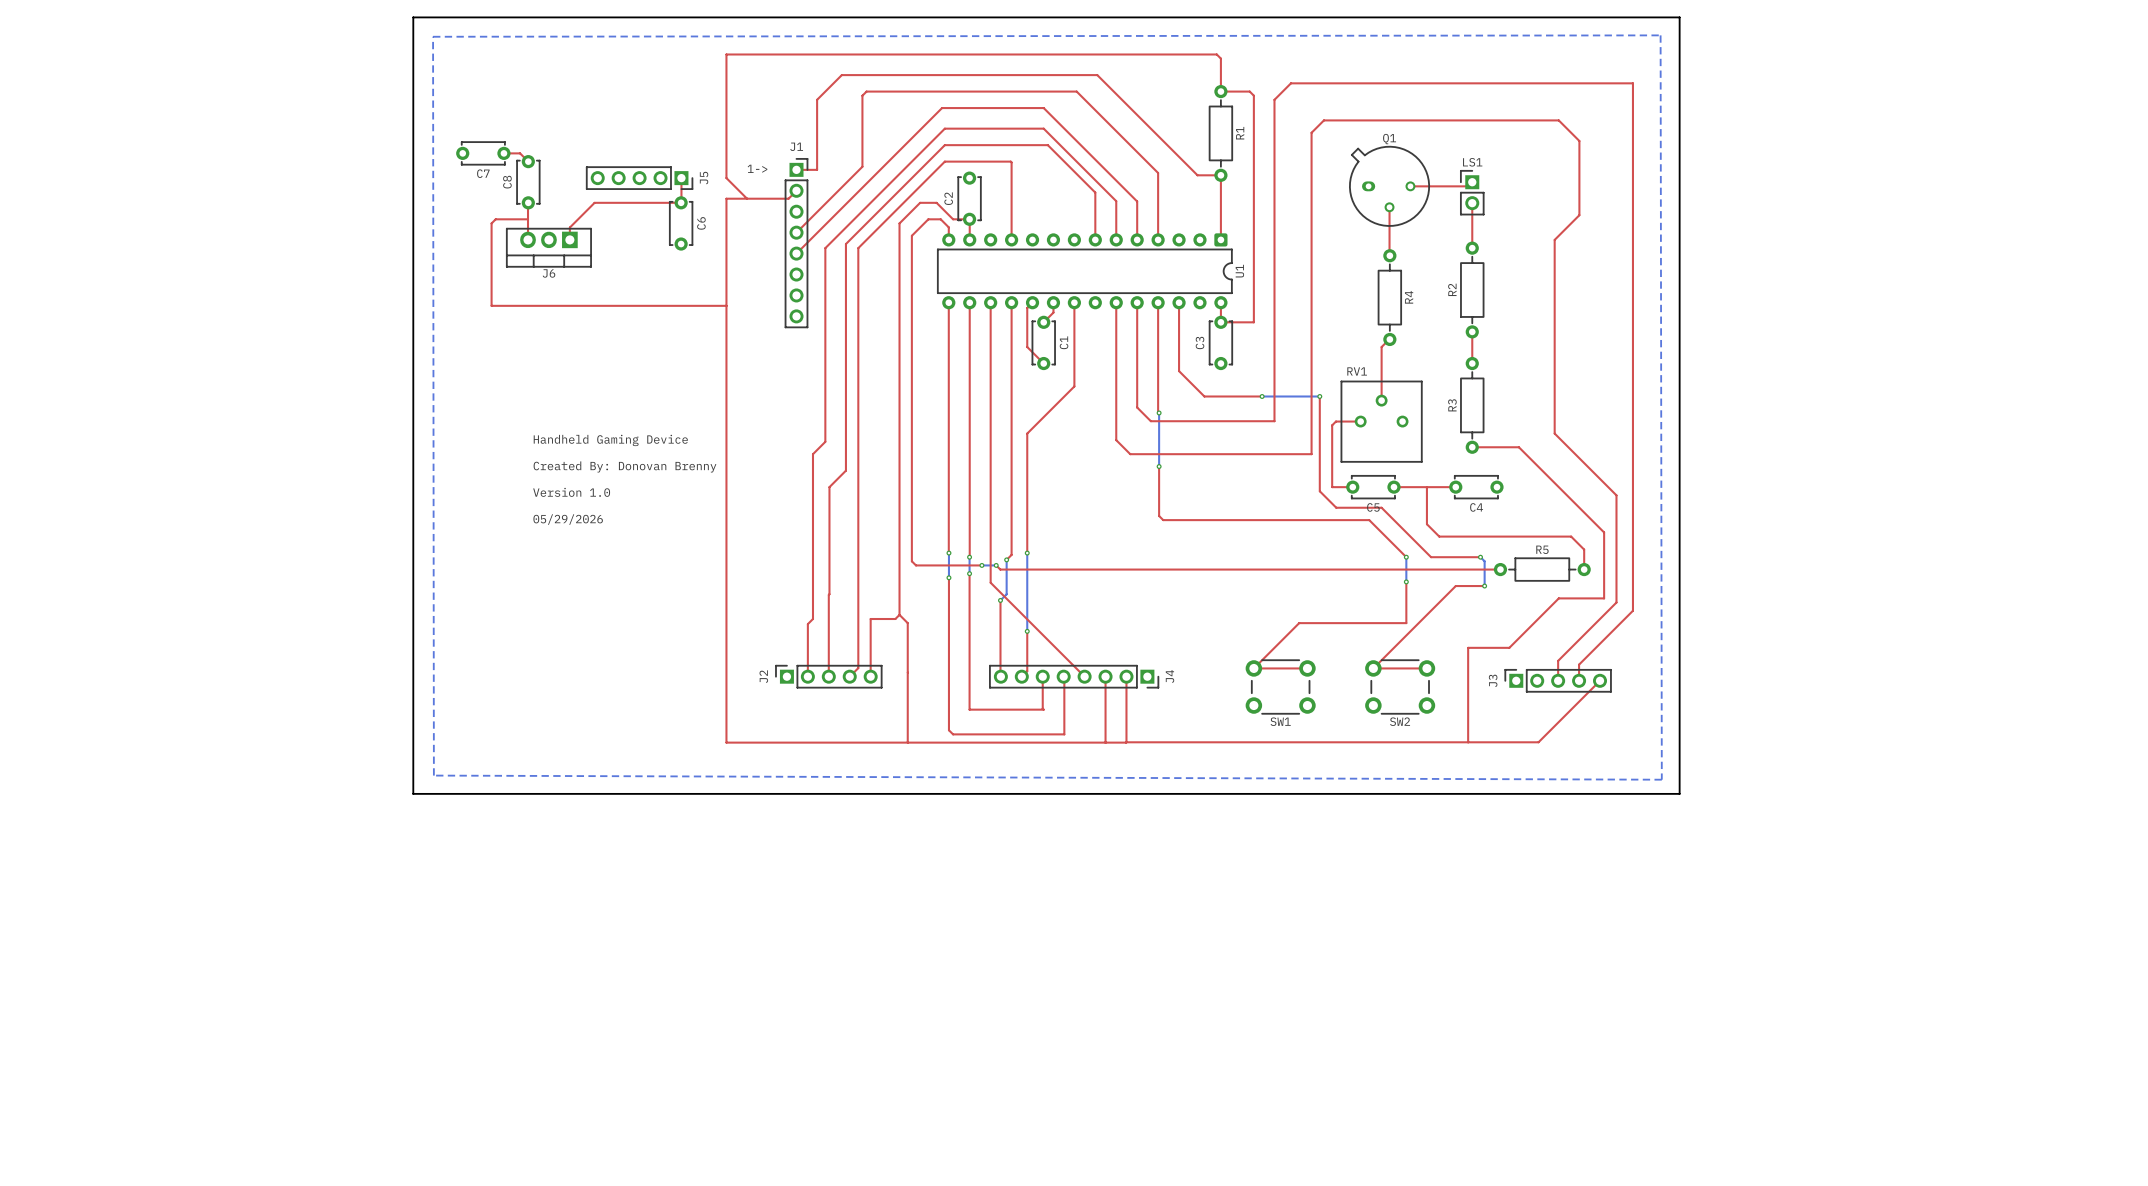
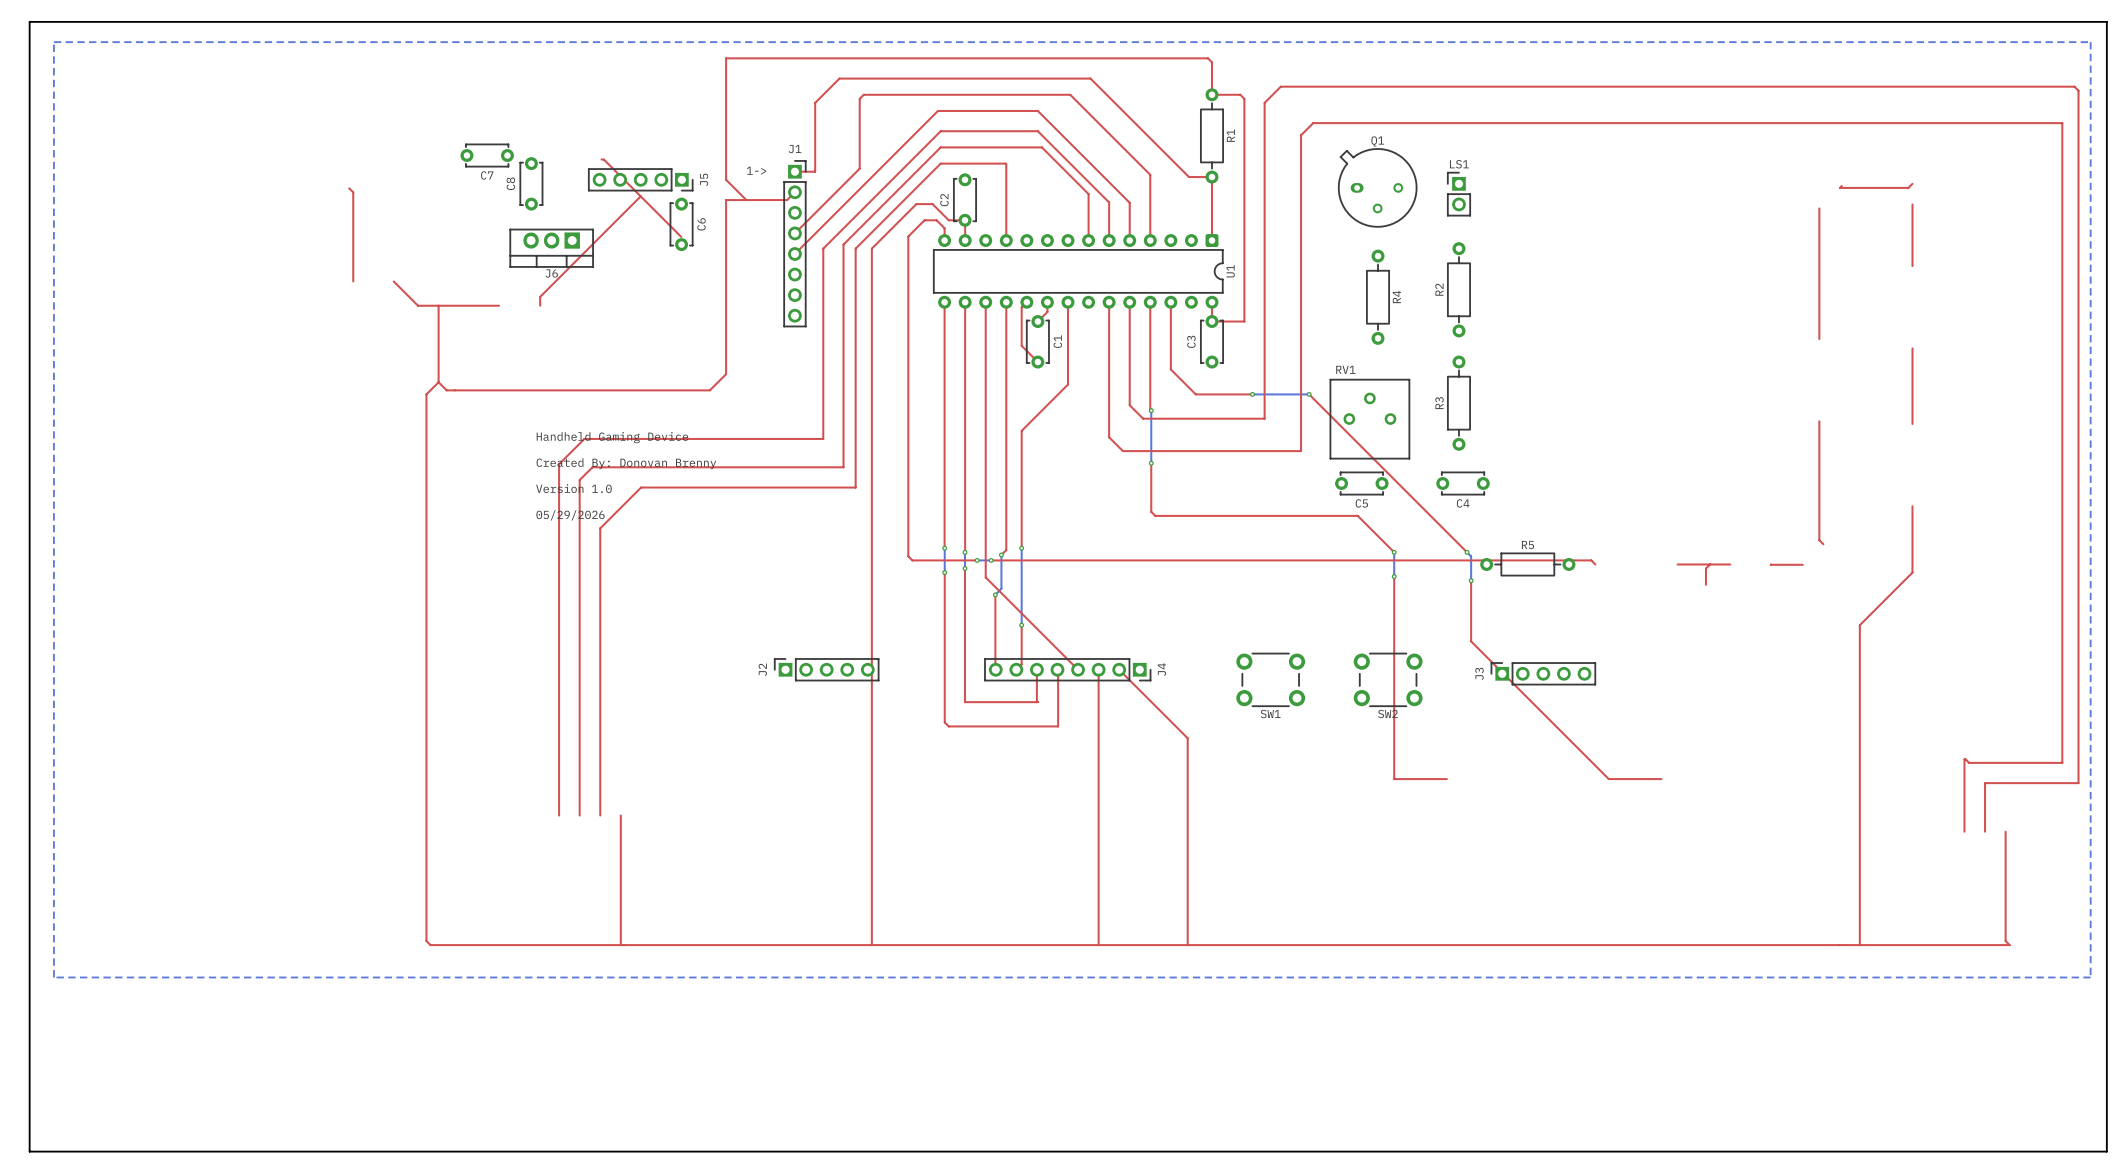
board edge: (413, 17) (413, 793) (1679, 793) (1679, 17) -> (418, 21) (29, 21) (29, 1151) (2106, 1151) (2106, 21) (1662, 21)
bottom zone outline: (1660, 35) (433, 36) (433, 775) (1661, 779) (1660, 35) -> none
bottom zone outline: none -> (53, 42) (2090, 42) (2090, 977) (53, 977) (53, 42)
top track: (1632, 83) (1632, 610) (1579, 664) (1579, 680) -> (1616, 86) (2074, 86) (2078, 90) (2078, 783) (1985, 783) (1985, 831)
top track: (1558, 120) (1579, 141) (1579, 215) (1554, 239) (1554, 433) (1616, 495) (1616, 602) (1558, 660) (1558, 680) -> (1544, 123) (2062, 123) (2062, 762) (1969, 762) (1965, 758) (1964, 831)
top track: (503, 153) (520, 153) (528, 161) -> none
top track: none -> (601, 159) (603, 159) (681, 236)
top track: (681, 178) (681, 202) (594, 202) (569, 227) (569, 239) -> none
top track: (1472, 182) (1468, 186) (1410, 186) -> none
top track: none -> (1912, 183) (1908, 187) (1839, 187) (1841, 186)
top track: none -> (349, 188) (353, 192) (353, 281)
top track: none -> (640, 196) (540, 296) (540, 305)
top track: (528, 202) (528, 239) -> none
top track: (1472, 203) (1472, 248) -> none
top track: none -> (1912, 204) (1912, 266)
top track: (1389, 207) (1389, 255) -> none
top track: none -> (1819, 208) (1819, 339)
top track: (528, 219) (495, 219) (491, 223) (491, 305) (726, 305) -> none
top track: (899, 223) (899, 614) -> (896, 224) (871, 248) (871, 945)
top track: none -> (393, 281) (418, 305) (499, 305)
top track: none -> (438, 305) (438, 382)
top track: (1472, 331) (1472, 363) -> none
top track: (1389, 339) (1381, 347) (1381, 400) -> none
top track: none -> (1912, 348) (1912, 424)
top track: (726, 375) (726, 742) (1126, 742) -> (726, 374) (709, 390) (446, 390) (438, 382)
top track: none -> (438, 382) (426, 394) (426, 941) (430, 945) (2009, 945) (2005, 941) (2005, 831)
top track: (1319, 396) (1319, 491) (1336, 507) (1381, 507) (1431, 557) (1480, 557) -> (1309, 394) (1467, 552)
top track: (1360, 421) (1335, 421) (1332, 425) (1332, 487) (1352, 487) -> none
top track: none -> (1819, 421) (1819, 540) (1823, 544)
top track: (825, 441) (812, 454) (812, 619) (807, 624) (807, 676) -> (823, 438) (584, 438) (559, 464) (559, 815)
top track: (1472, 447) (1518, 447) (1604, 532) (1604, 598) (1558, 598) (1509, 647) (1468, 647) (1468, 742) -> none
top track: (845, 470) (829, 487) (828, 676) -> (843, 467) (592, 467) (579, 480) (579, 815)
top track: (1393, 487) (1455, 487) -> none
top track: (1426, 487) (1426, 524) (1439, 536) (1571, 536) (1584, 549) (1584, 569) -> none
top track: (858, 491) (858, 668) (849, 676) -> (855, 487) (641, 487) (600, 528) (600, 815)
top track: none -> (1912, 506) (1912, 572) (1859, 625) (1859, 945)
top track: (996, 565) (1000, 569) (1500, 569) -> (991, 560) (1591, 560) (1595, 564)
top track: none -> (1677, 564) (1730, 564)
top track: none -> (1710, 564) (1705, 568) (1705, 584)
top track: none -> (1770, 564) (1802, 564)
top track: (1484, 586) (1455, 586) (1373, 668) (1426, 668) -> (1471, 580) (1471, 641) (1608, 779) (1661, 779)
top track: (899, 614) (895, 619) (870, 619) (870, 676) -> none
top track: (899, 614) (907, 623) (907, 742) -> none
top track: (1406, 623) (1299, 623) (1253, 668) (1307, 668) -> (1394, 617) (1394, 779) (1446, 779)
top track: (1126, 676) (1126, 742) -> (1119, 669) (1187, 738) (1187, 945)
top track: (1600, 680) (1538, 742) (1126, 742) -> none
top track: none -> (1098, 734) (1098, 945)
top track: none -> (620, 815) (620, 945)

